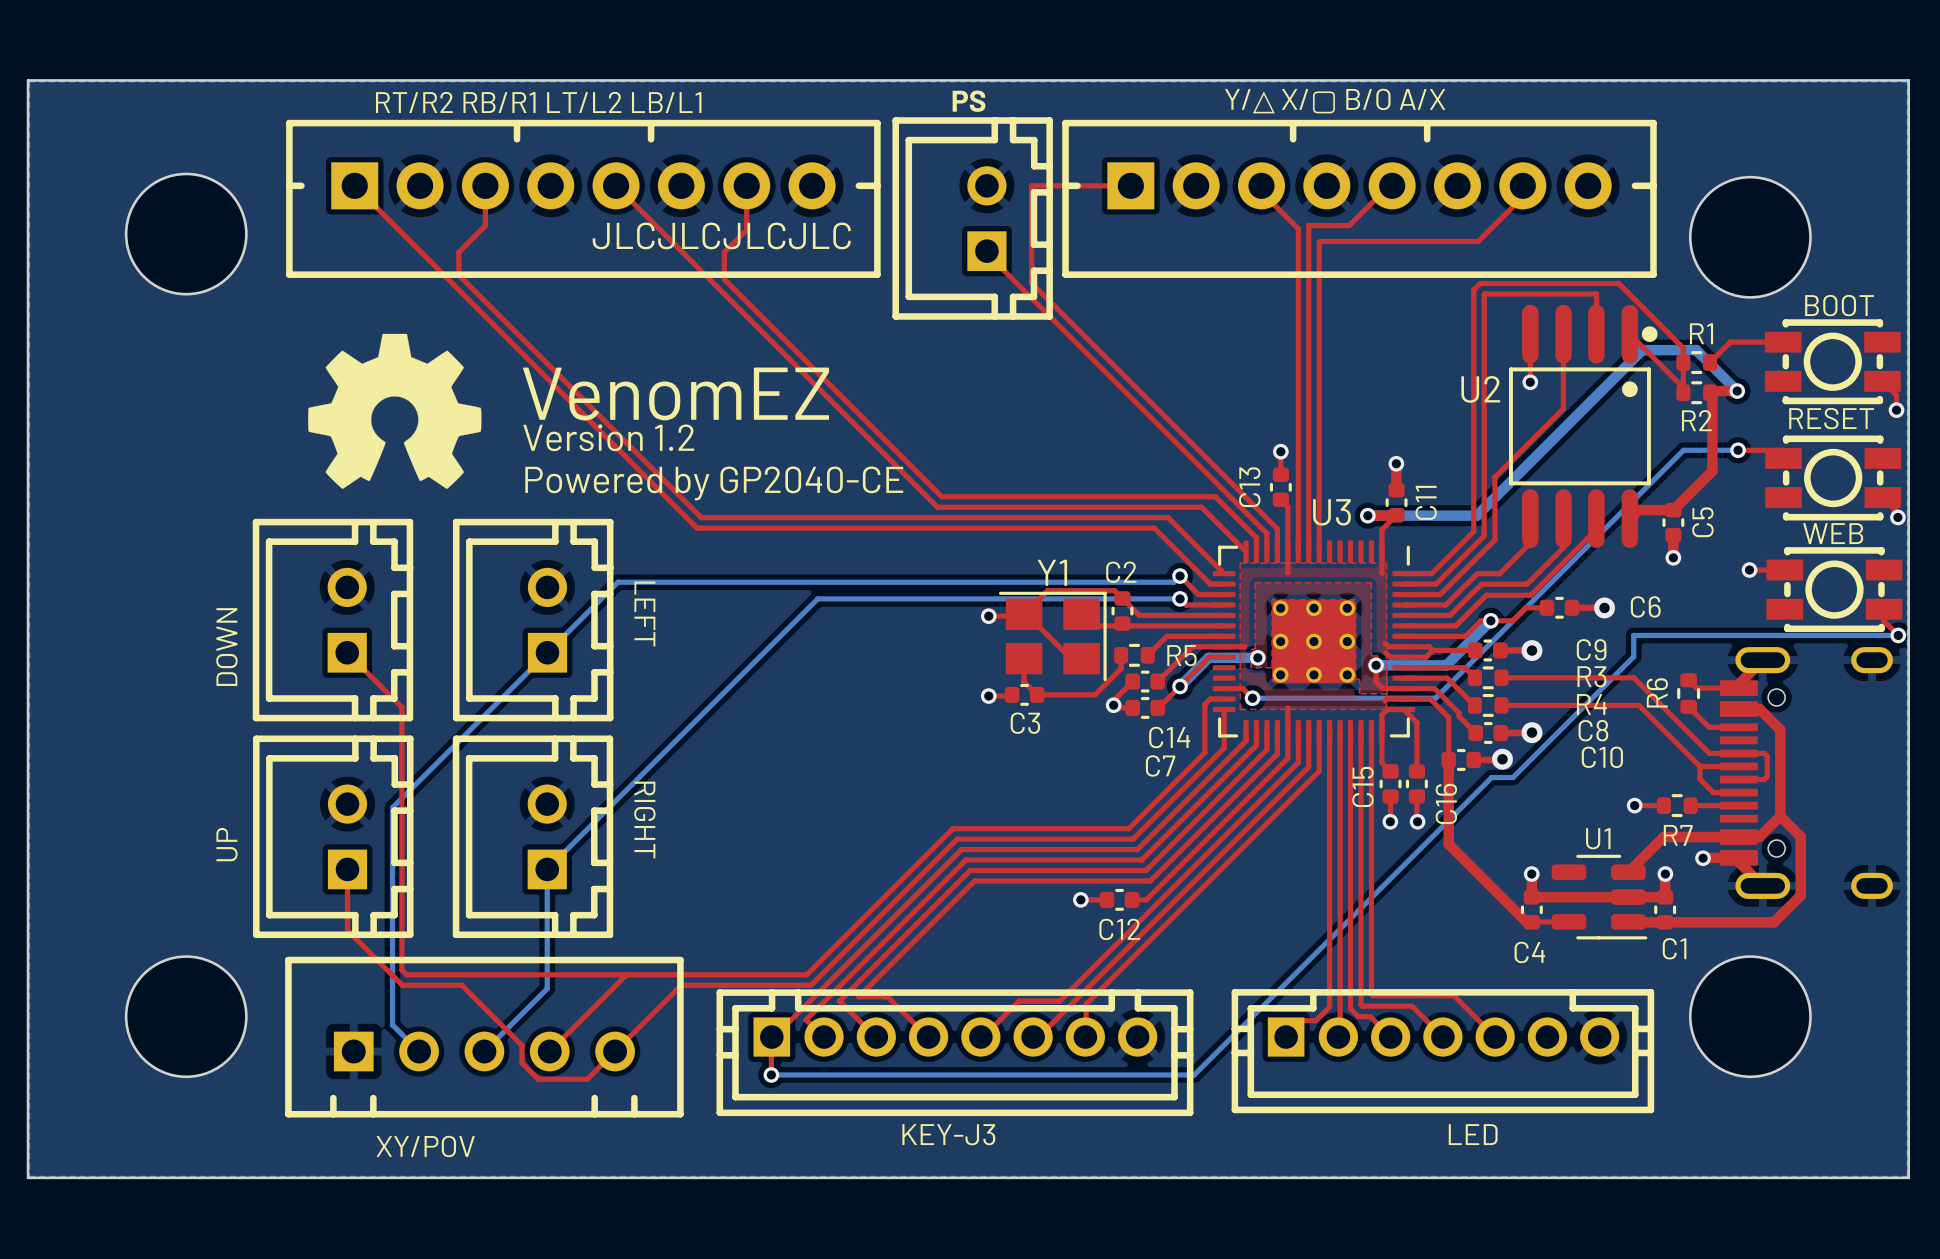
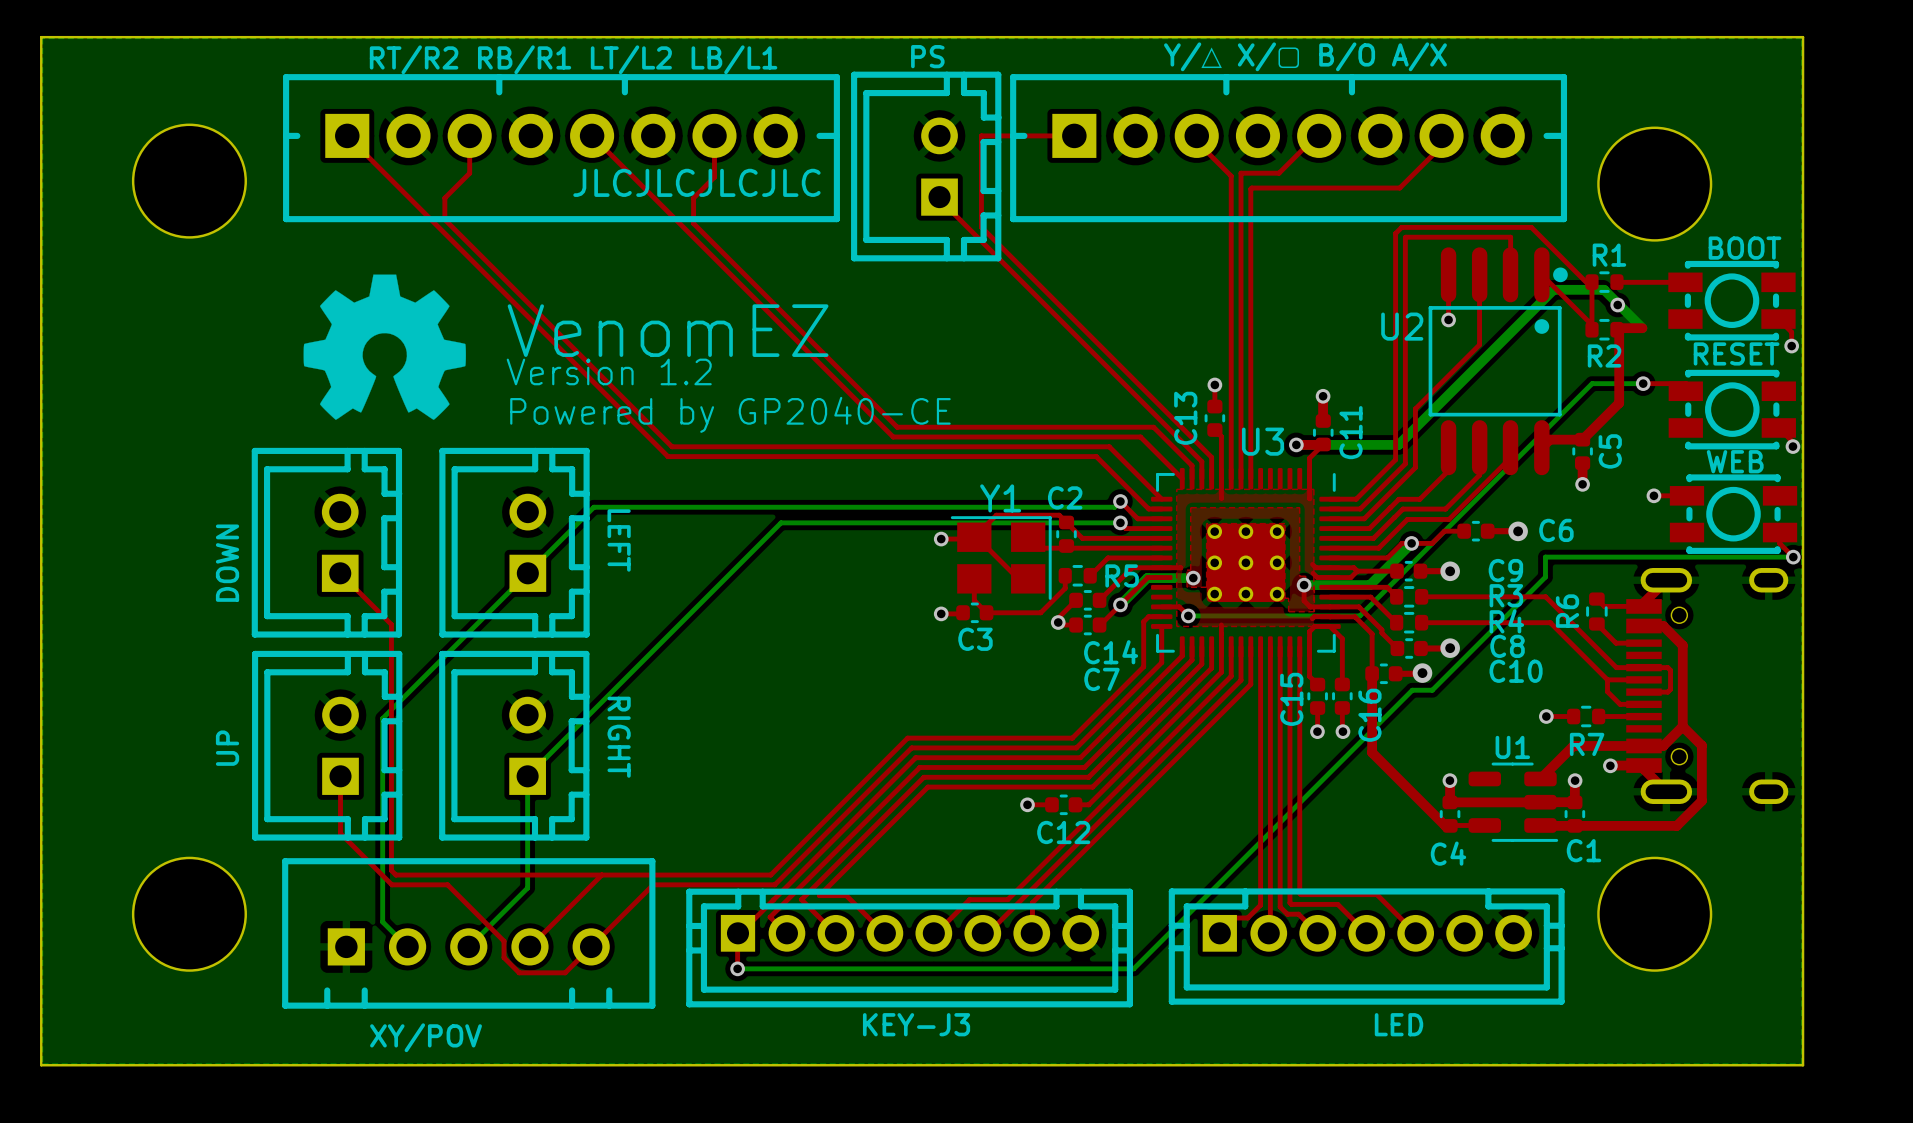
top track: (1730, 342) (1710, 362) -> (1636, 282) (1617, 282)
R1 position: (1696, 362) -> (1604, 282)
via position: (1737, 391) -> (1617, 305)

